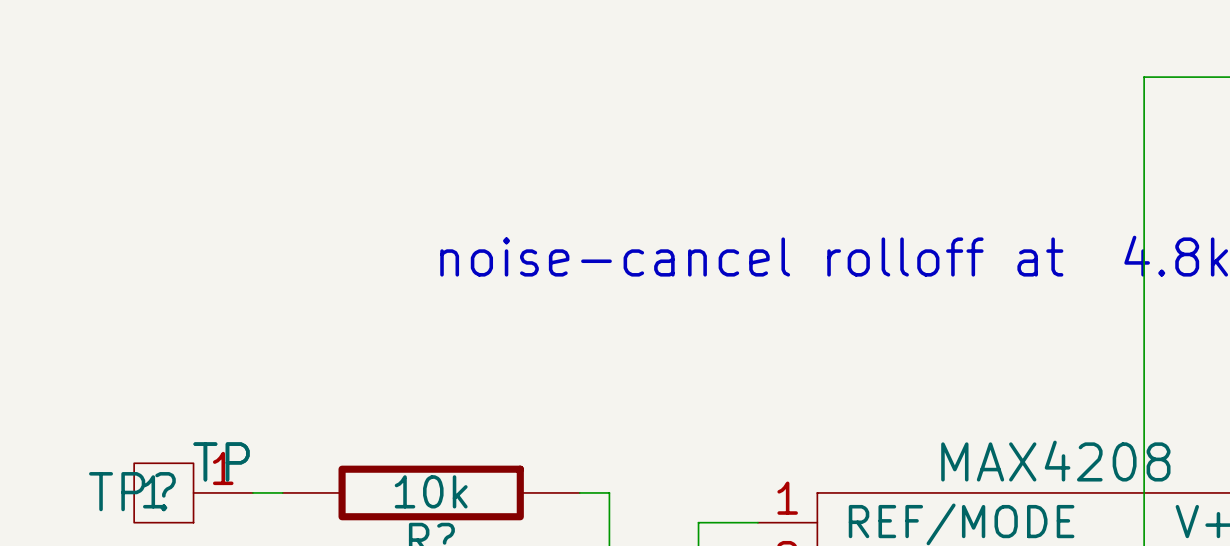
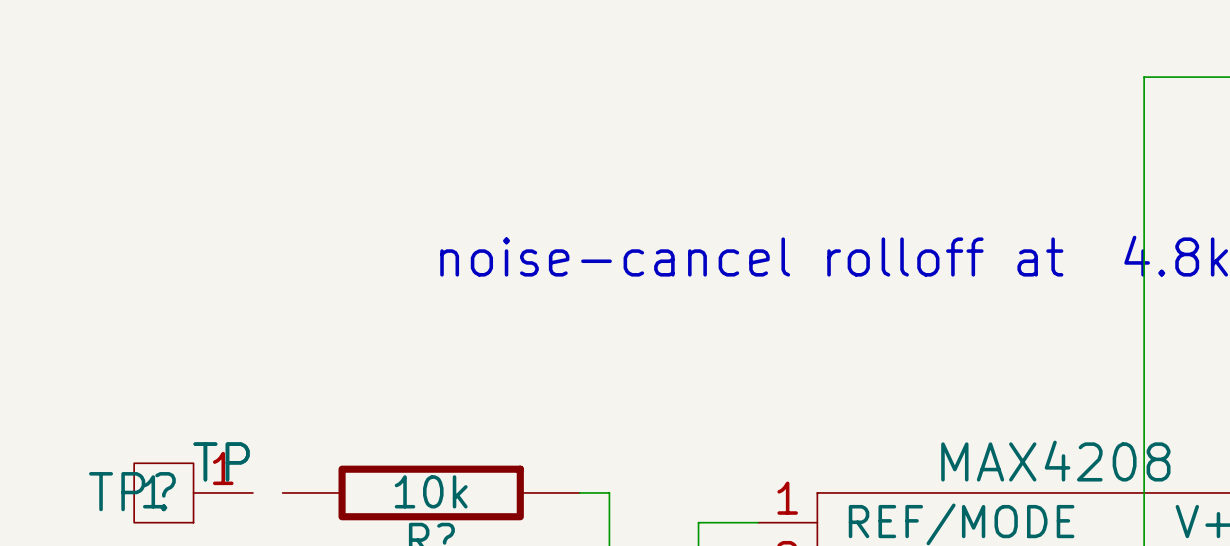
wire: (252, 492) (282, 492) -> none

